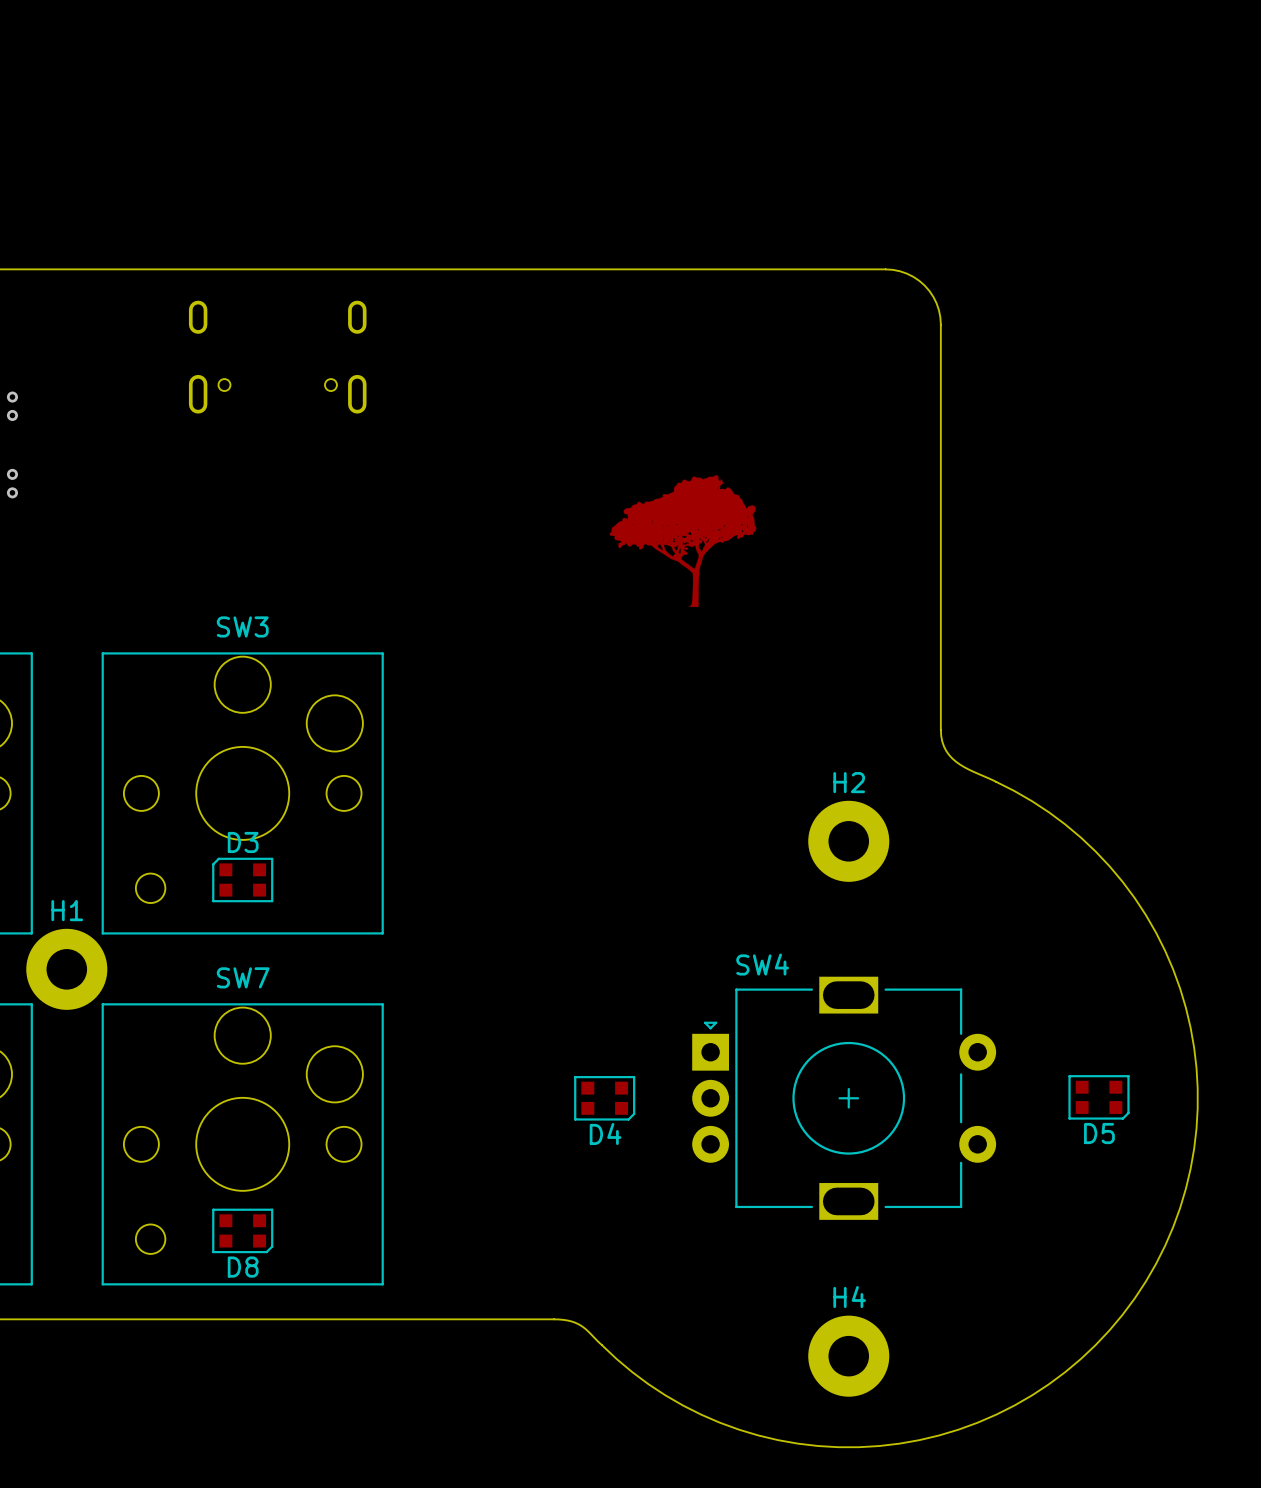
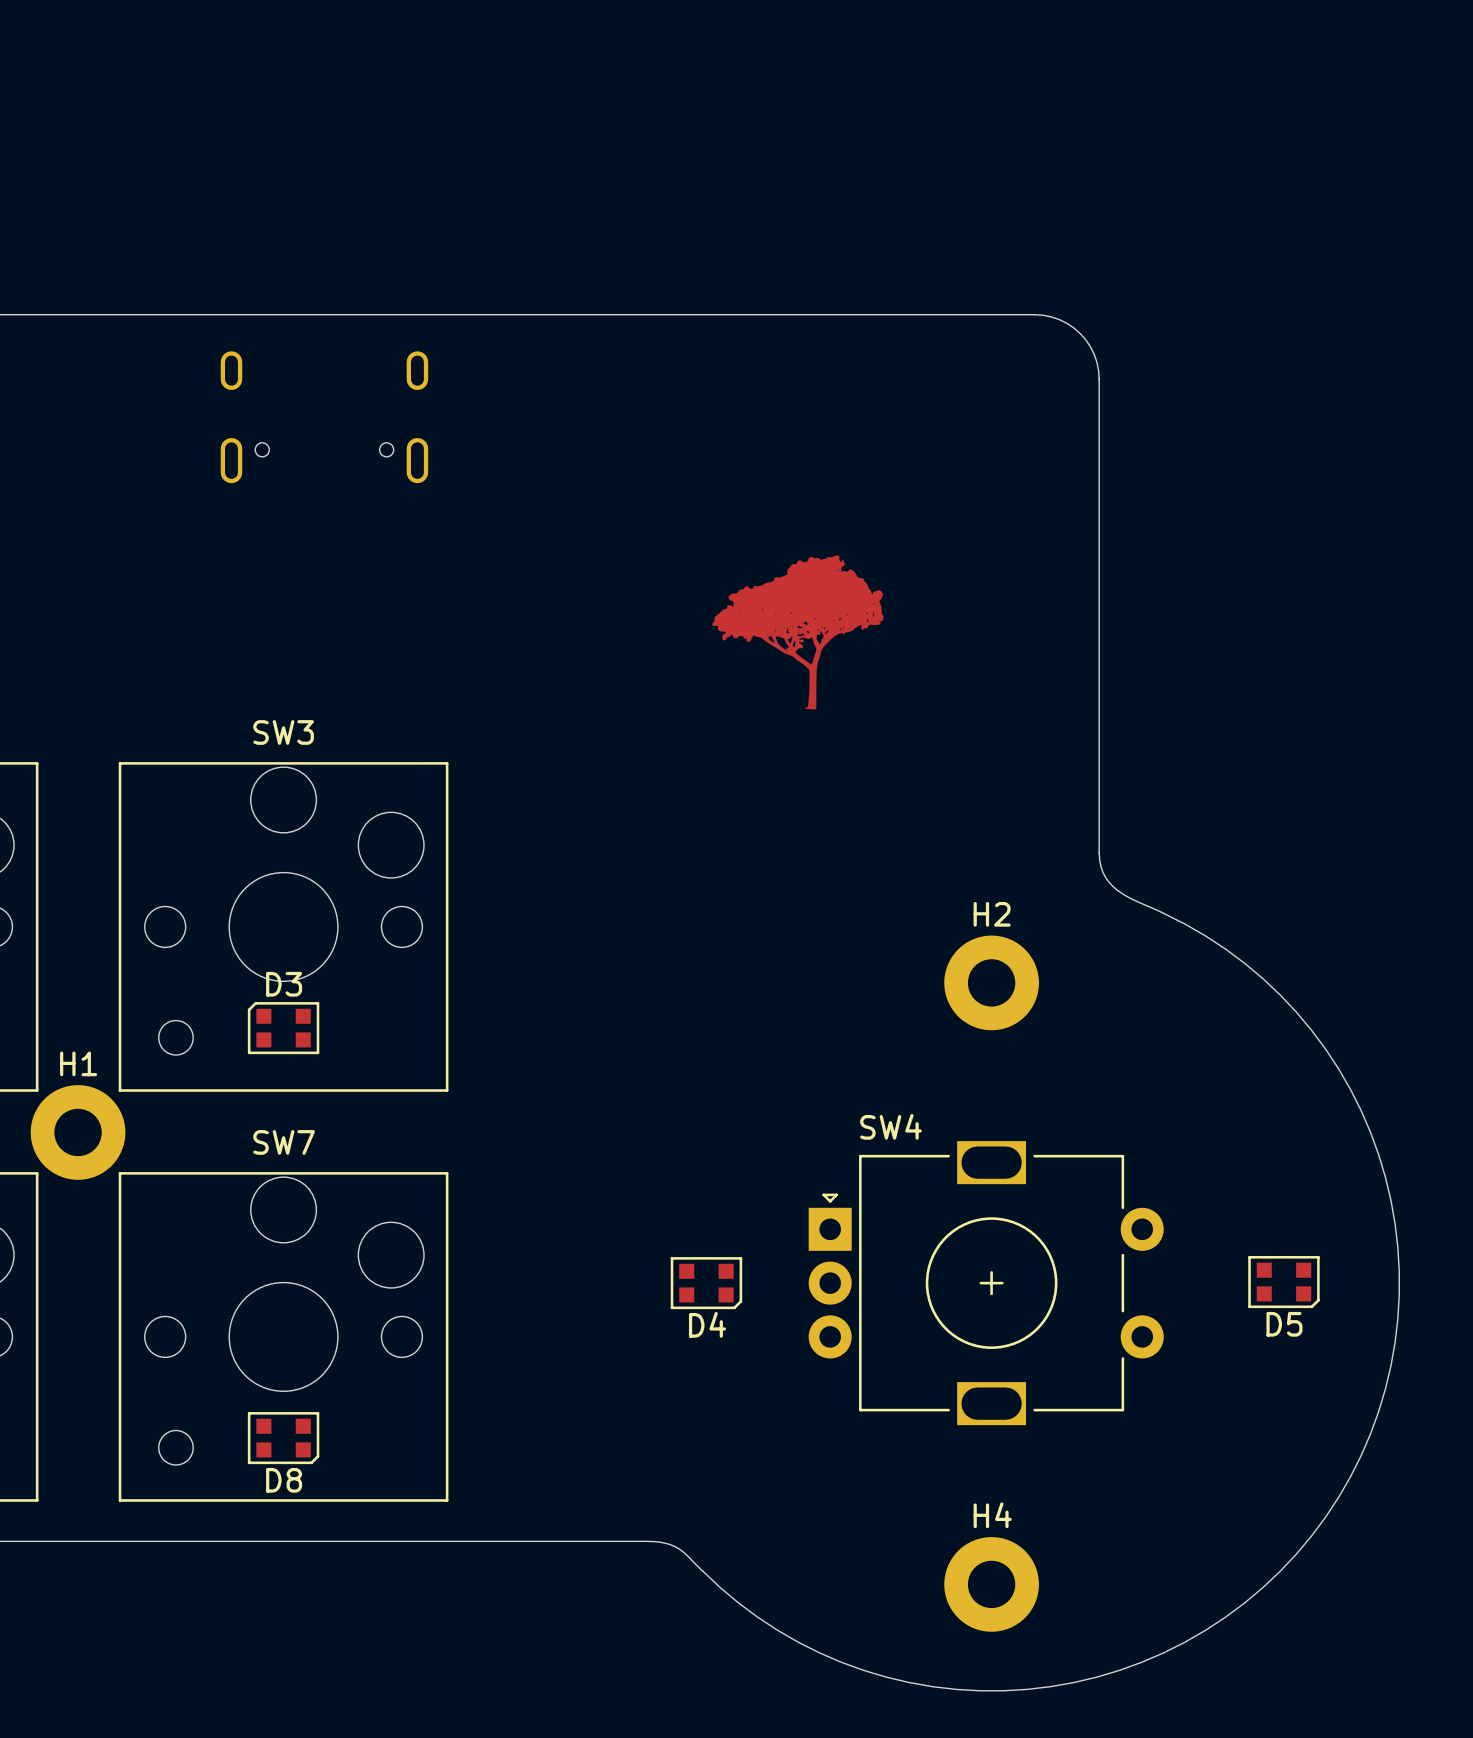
via: (12, 397) -> none
via: (12, 415) -> none
via: (12, 474) -> none
via: (12, 492) -> none

